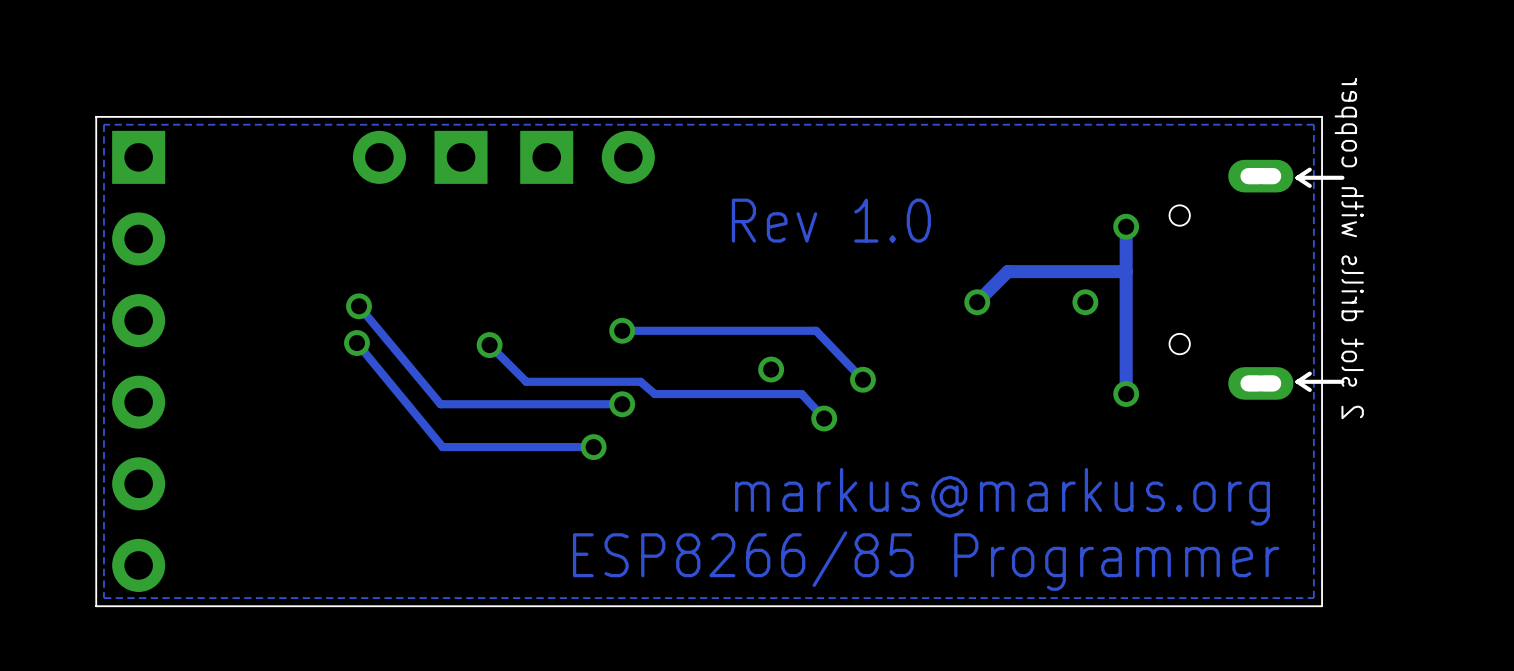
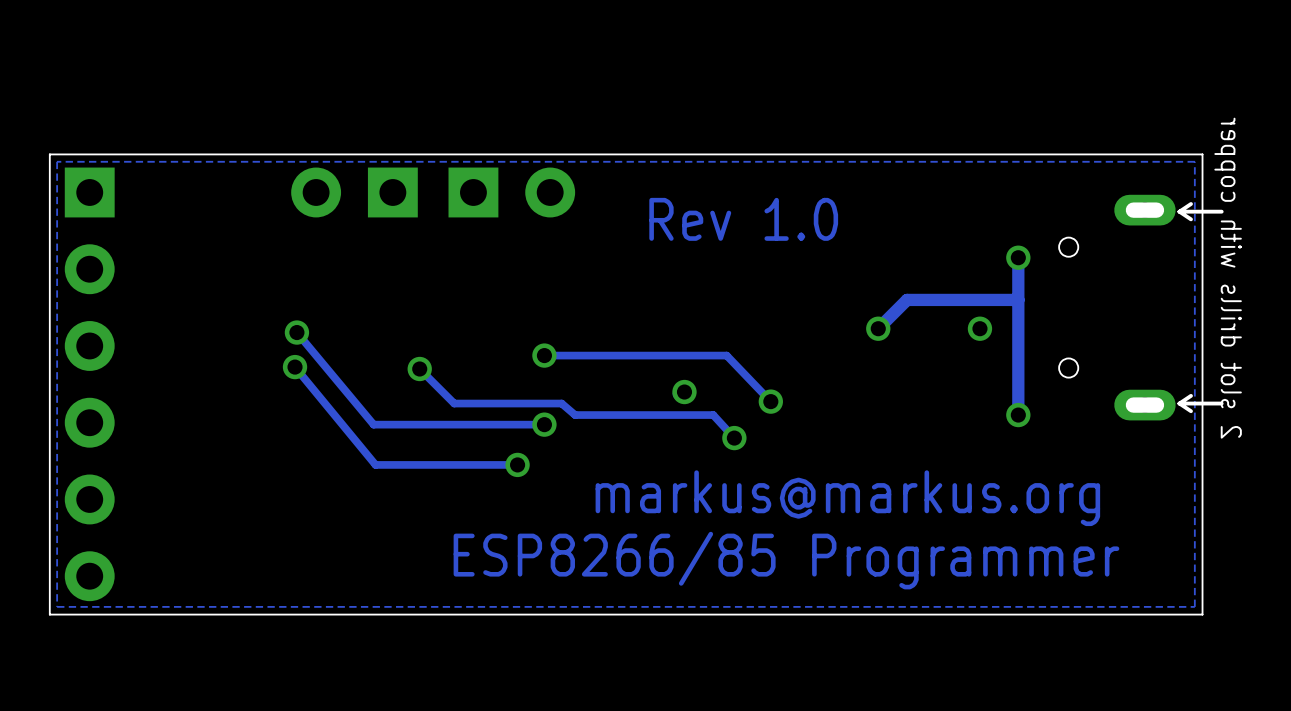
text position: Rev 1.0 (831, 220) -> Rev 1.0 (743, 219)
text position: markus@markus.org (1002, 496) -> markus@markus.org (847, 498)
text position: ESP8266/85 Programmer (926, 561) -> ESP8266/85 Programmer (786, 560)

